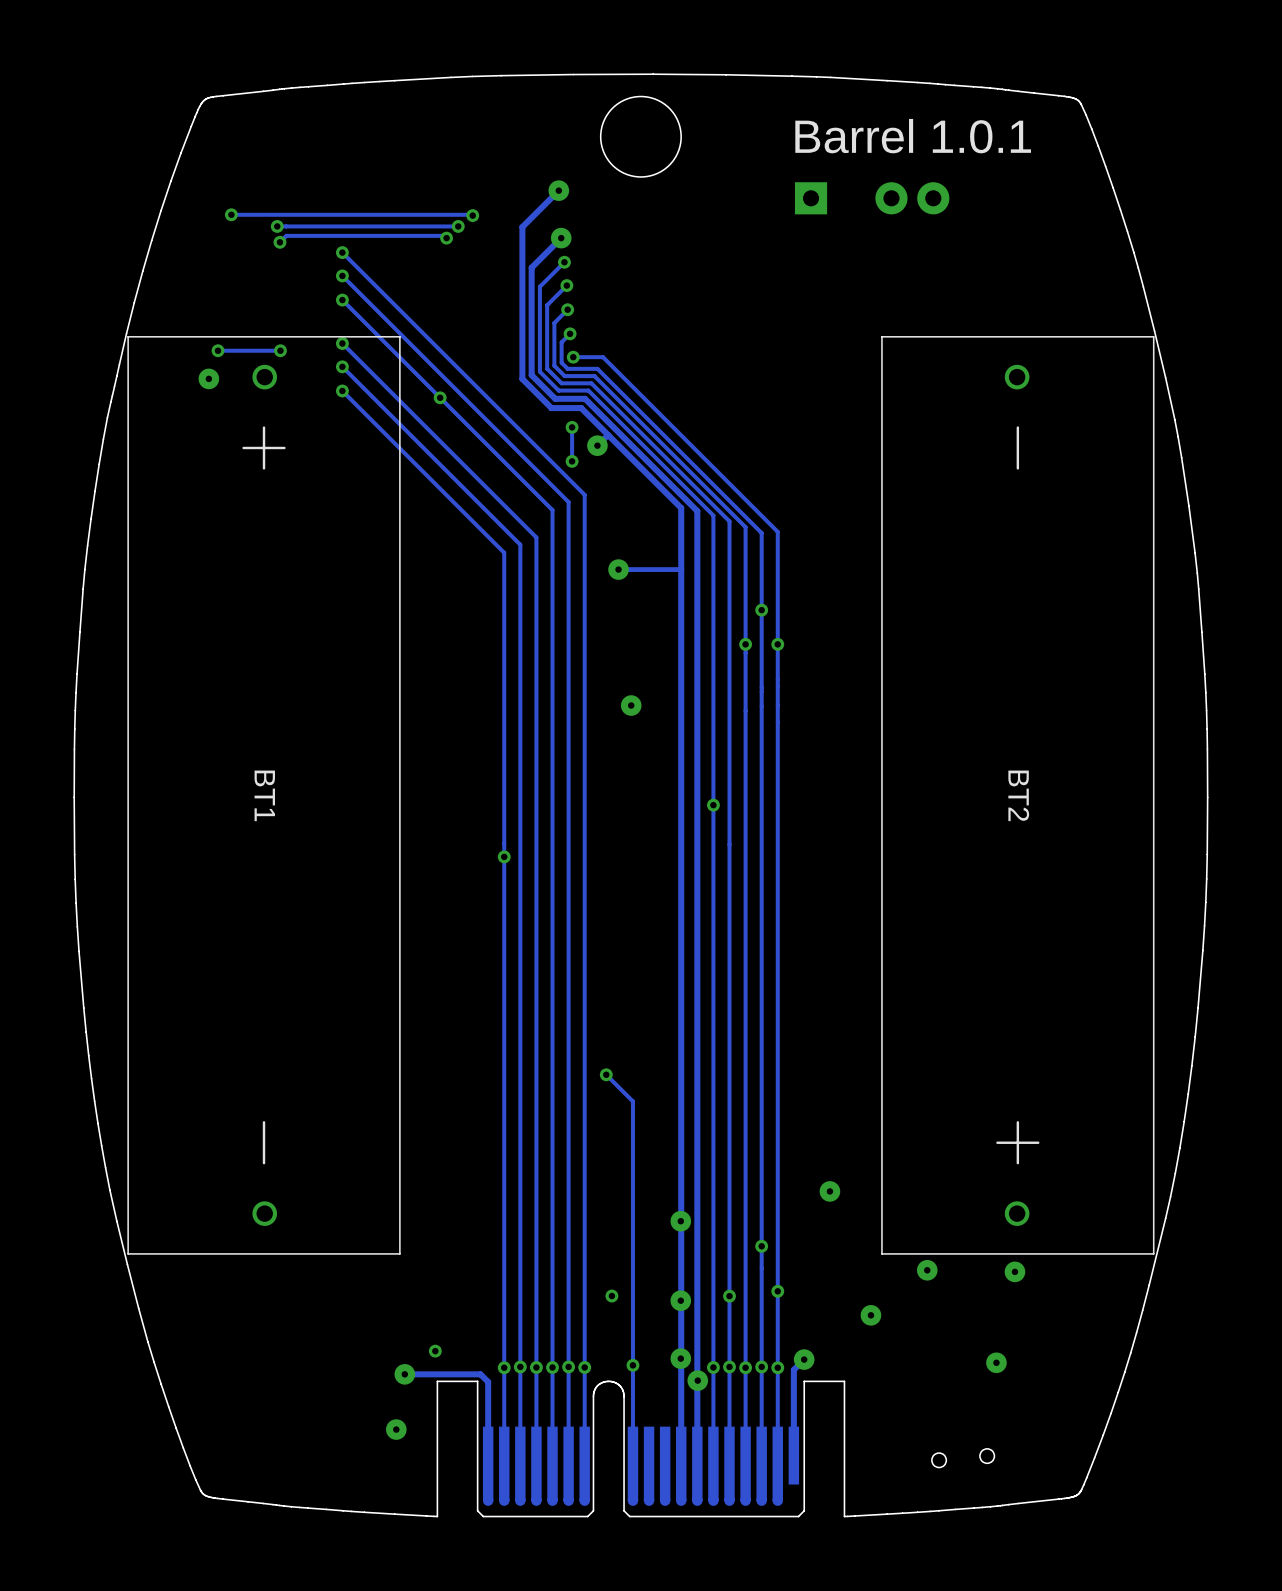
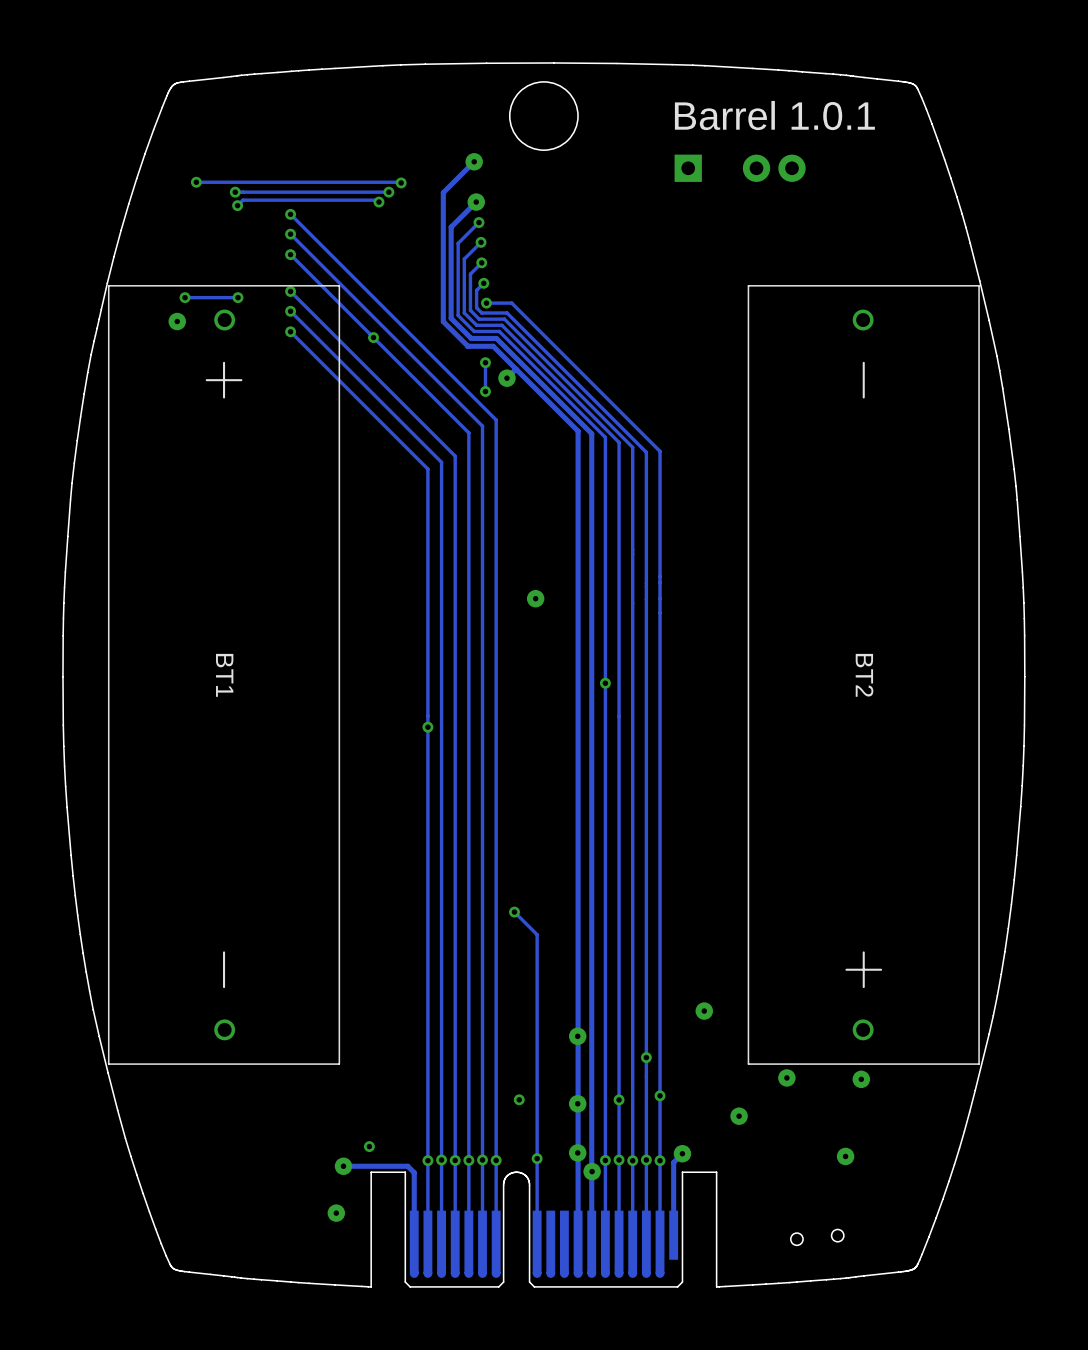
via: (618, 569) -> none
track: (681, 569) (618, 569) -> none
via: (761, 610) -> none
via: (745, 644) -> none
via: (777, 644) -> none

